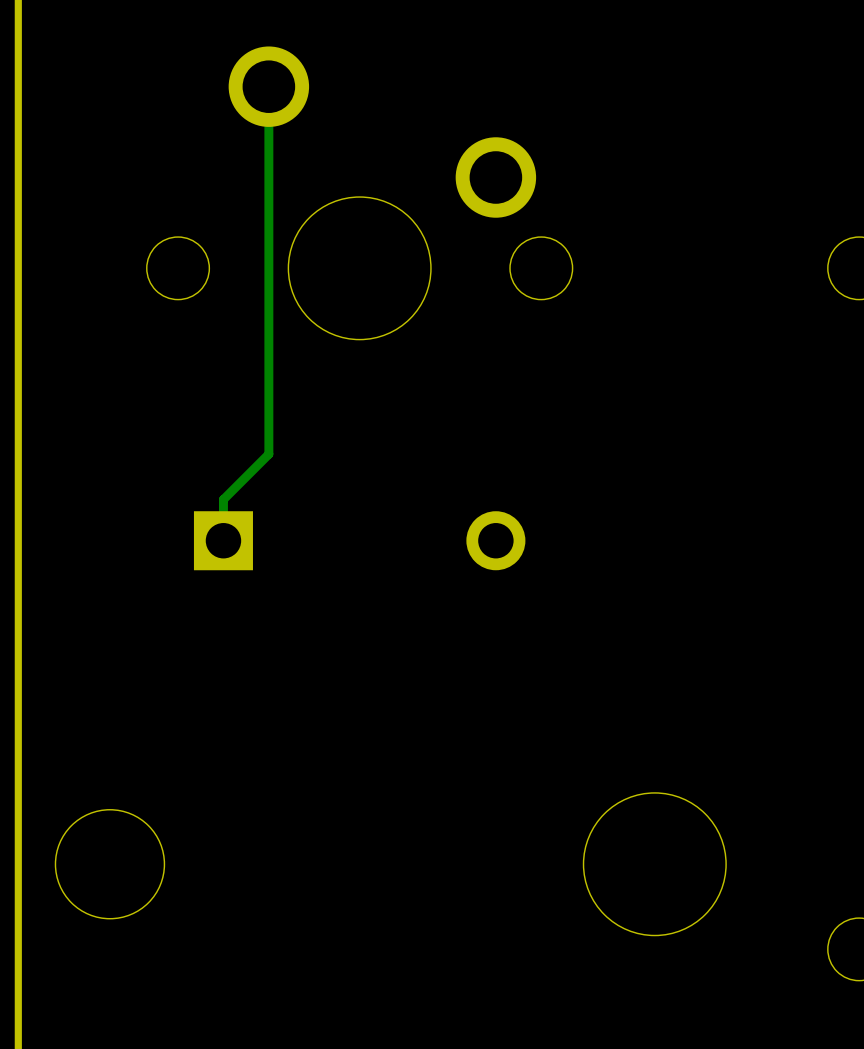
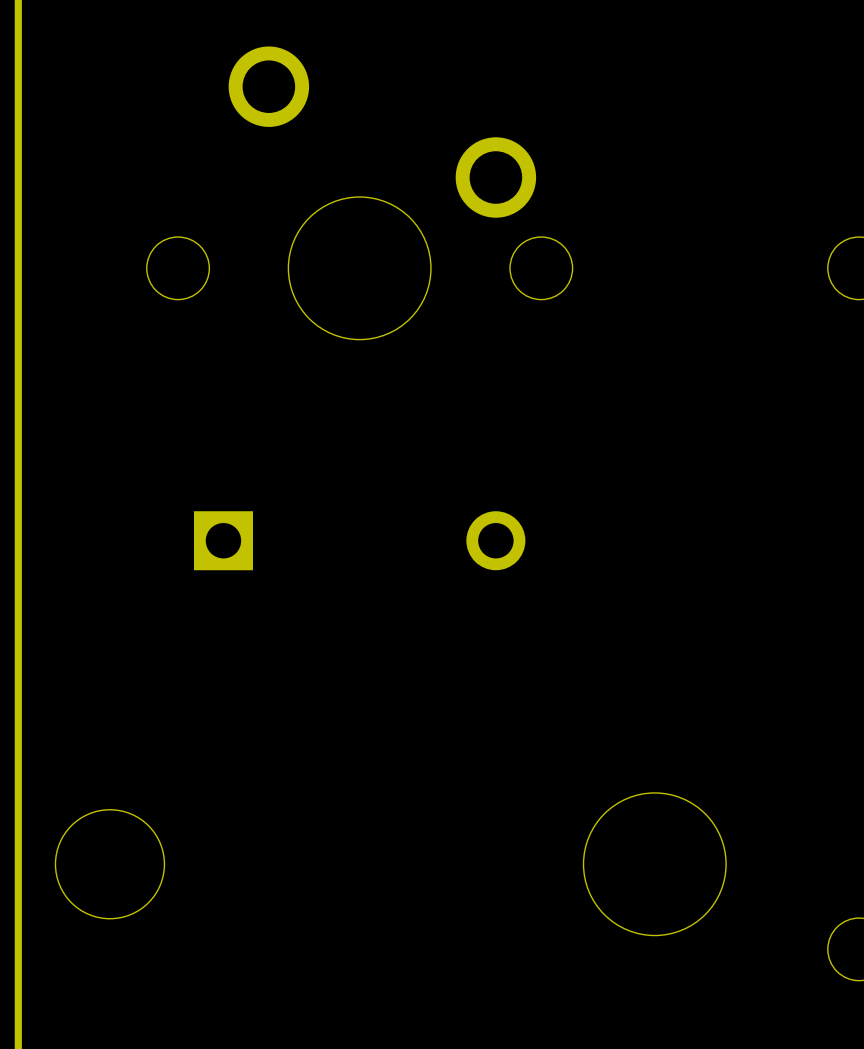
track: (268, 86) (268, 454) (223, 499) (223, 540) -> none

